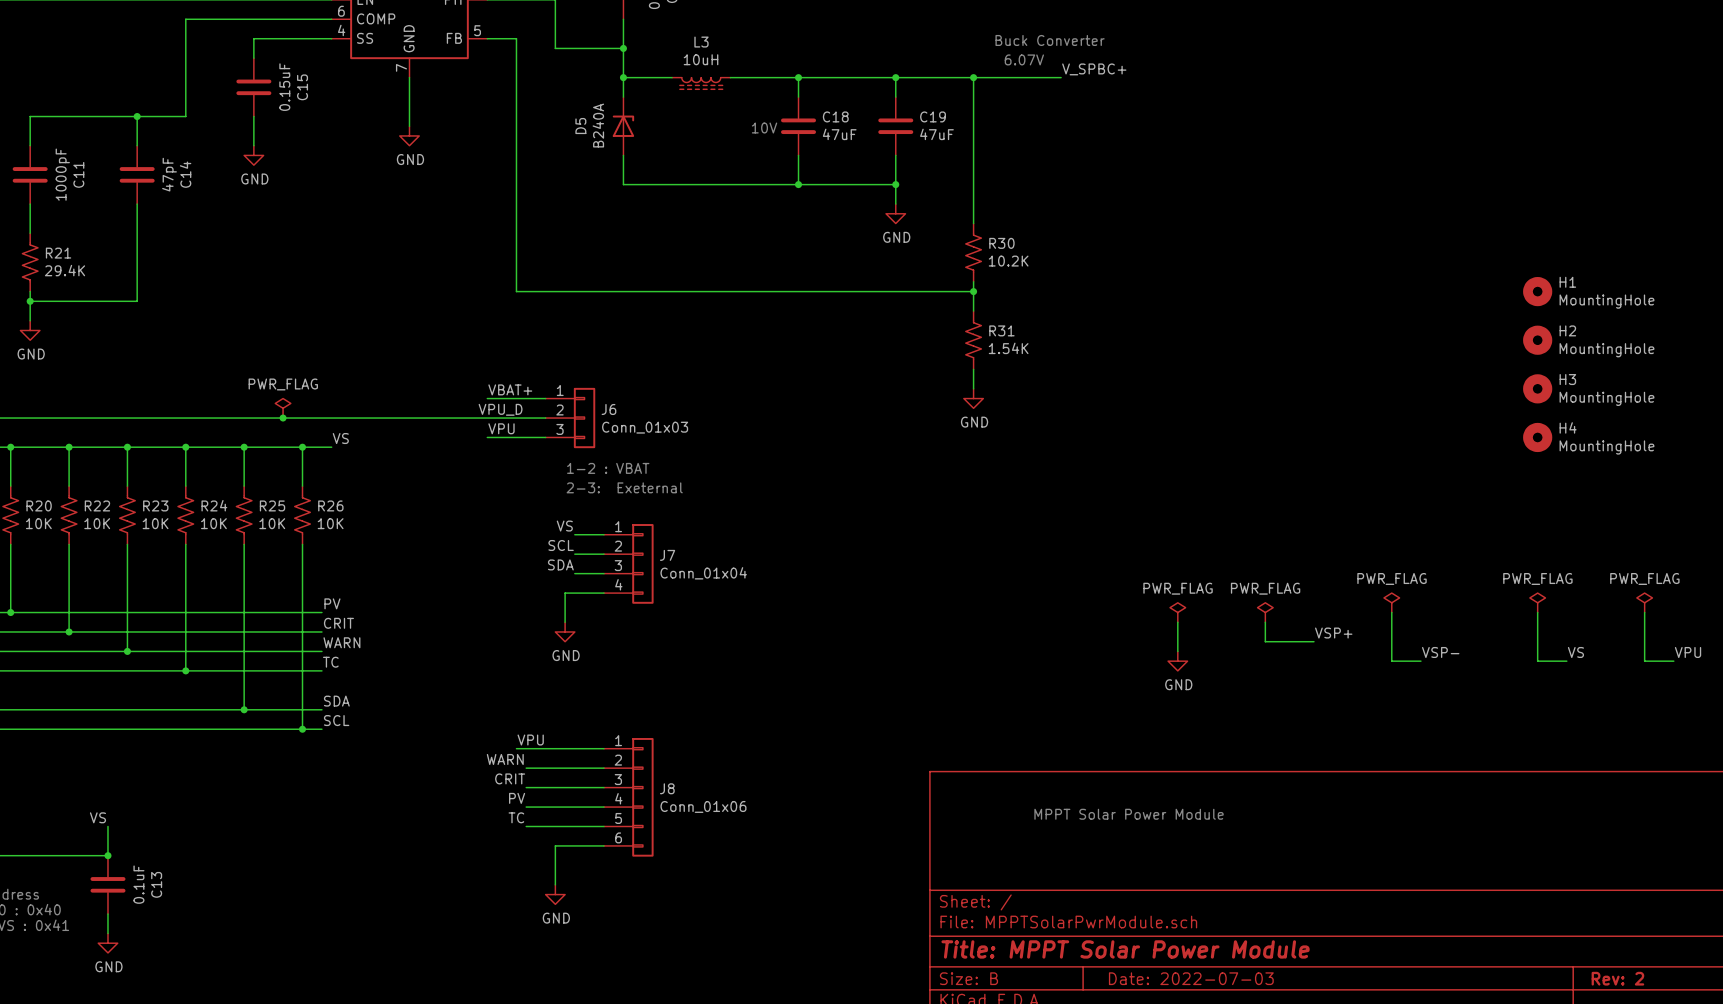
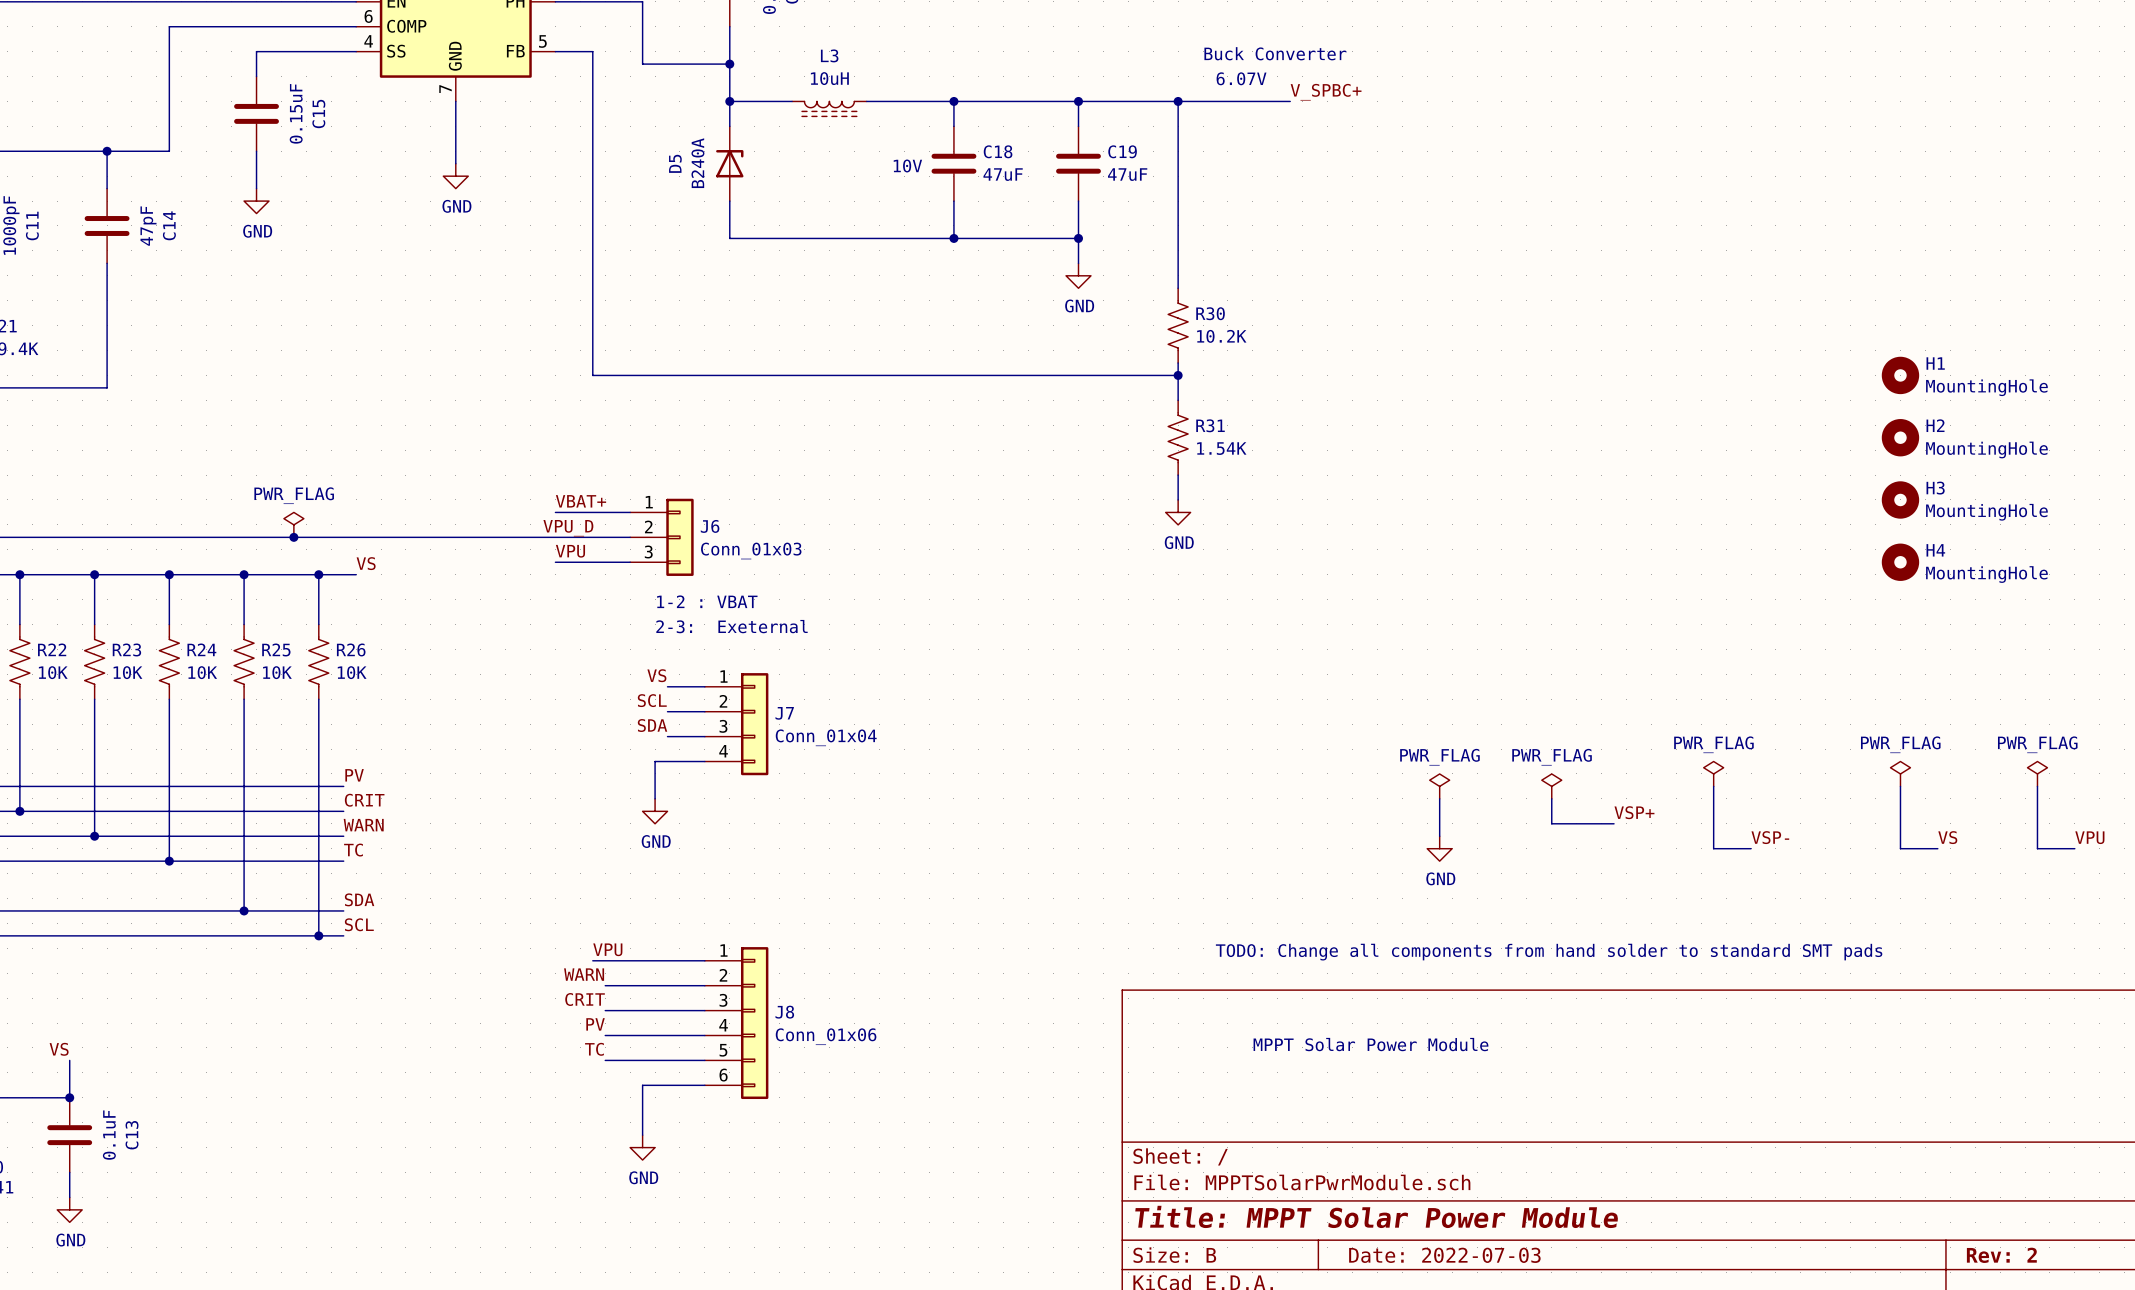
text: none -> TODO: Change all components from hand solder to standard SMT pads (1549, 952)

